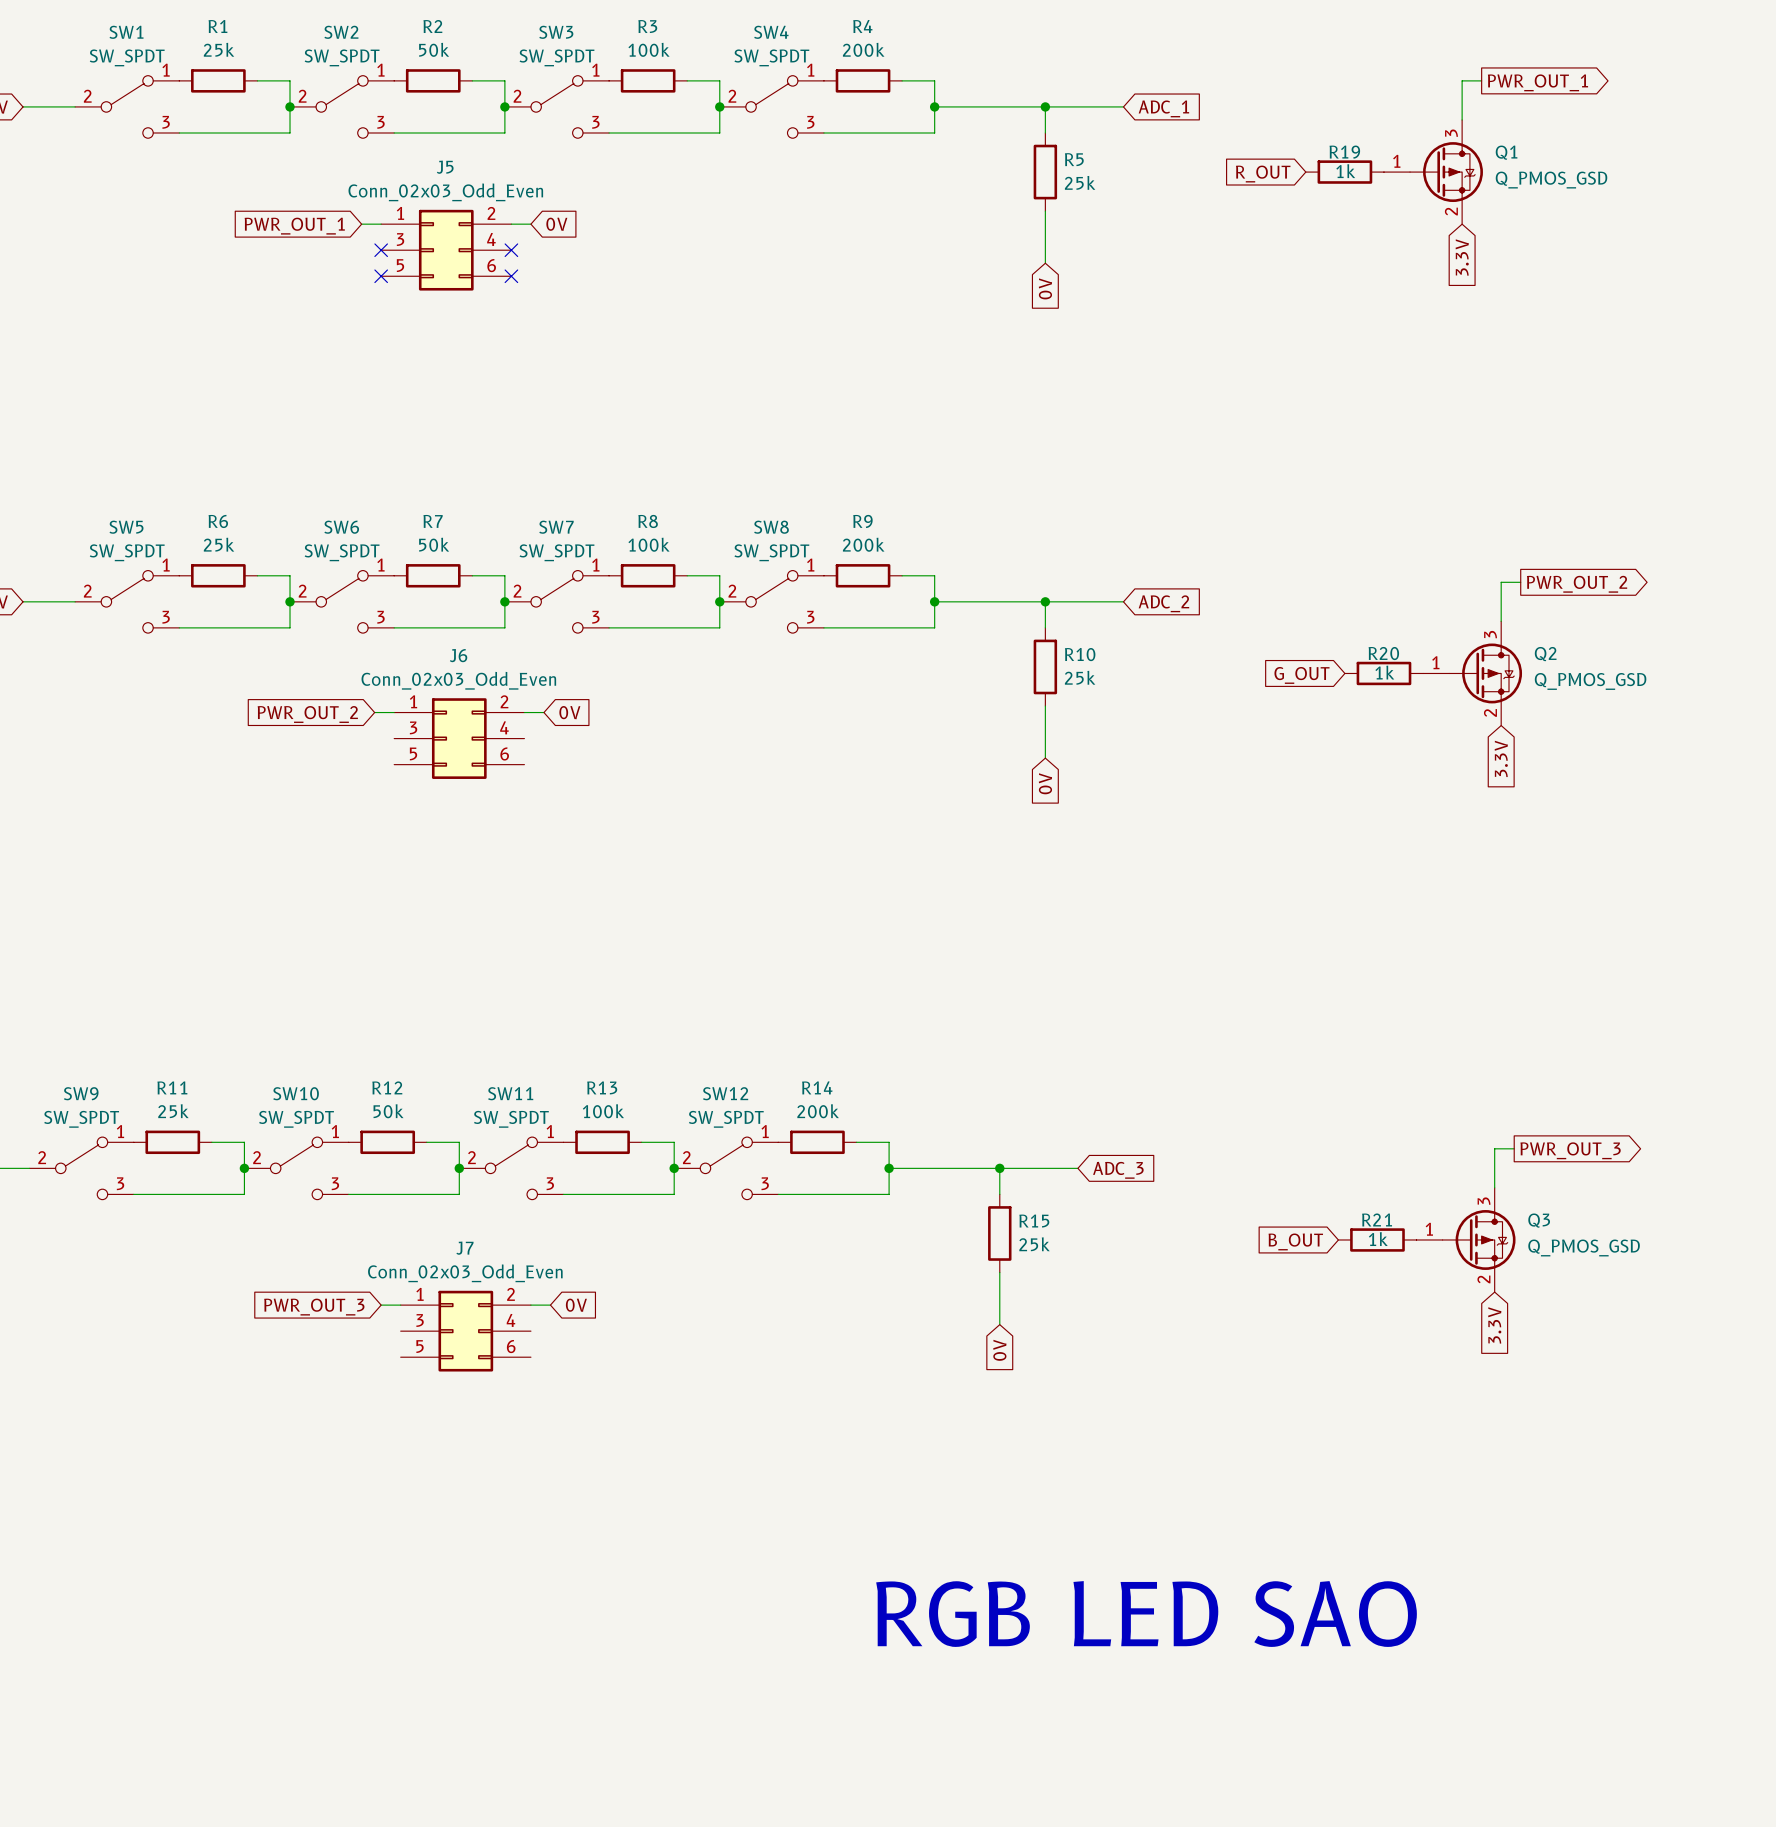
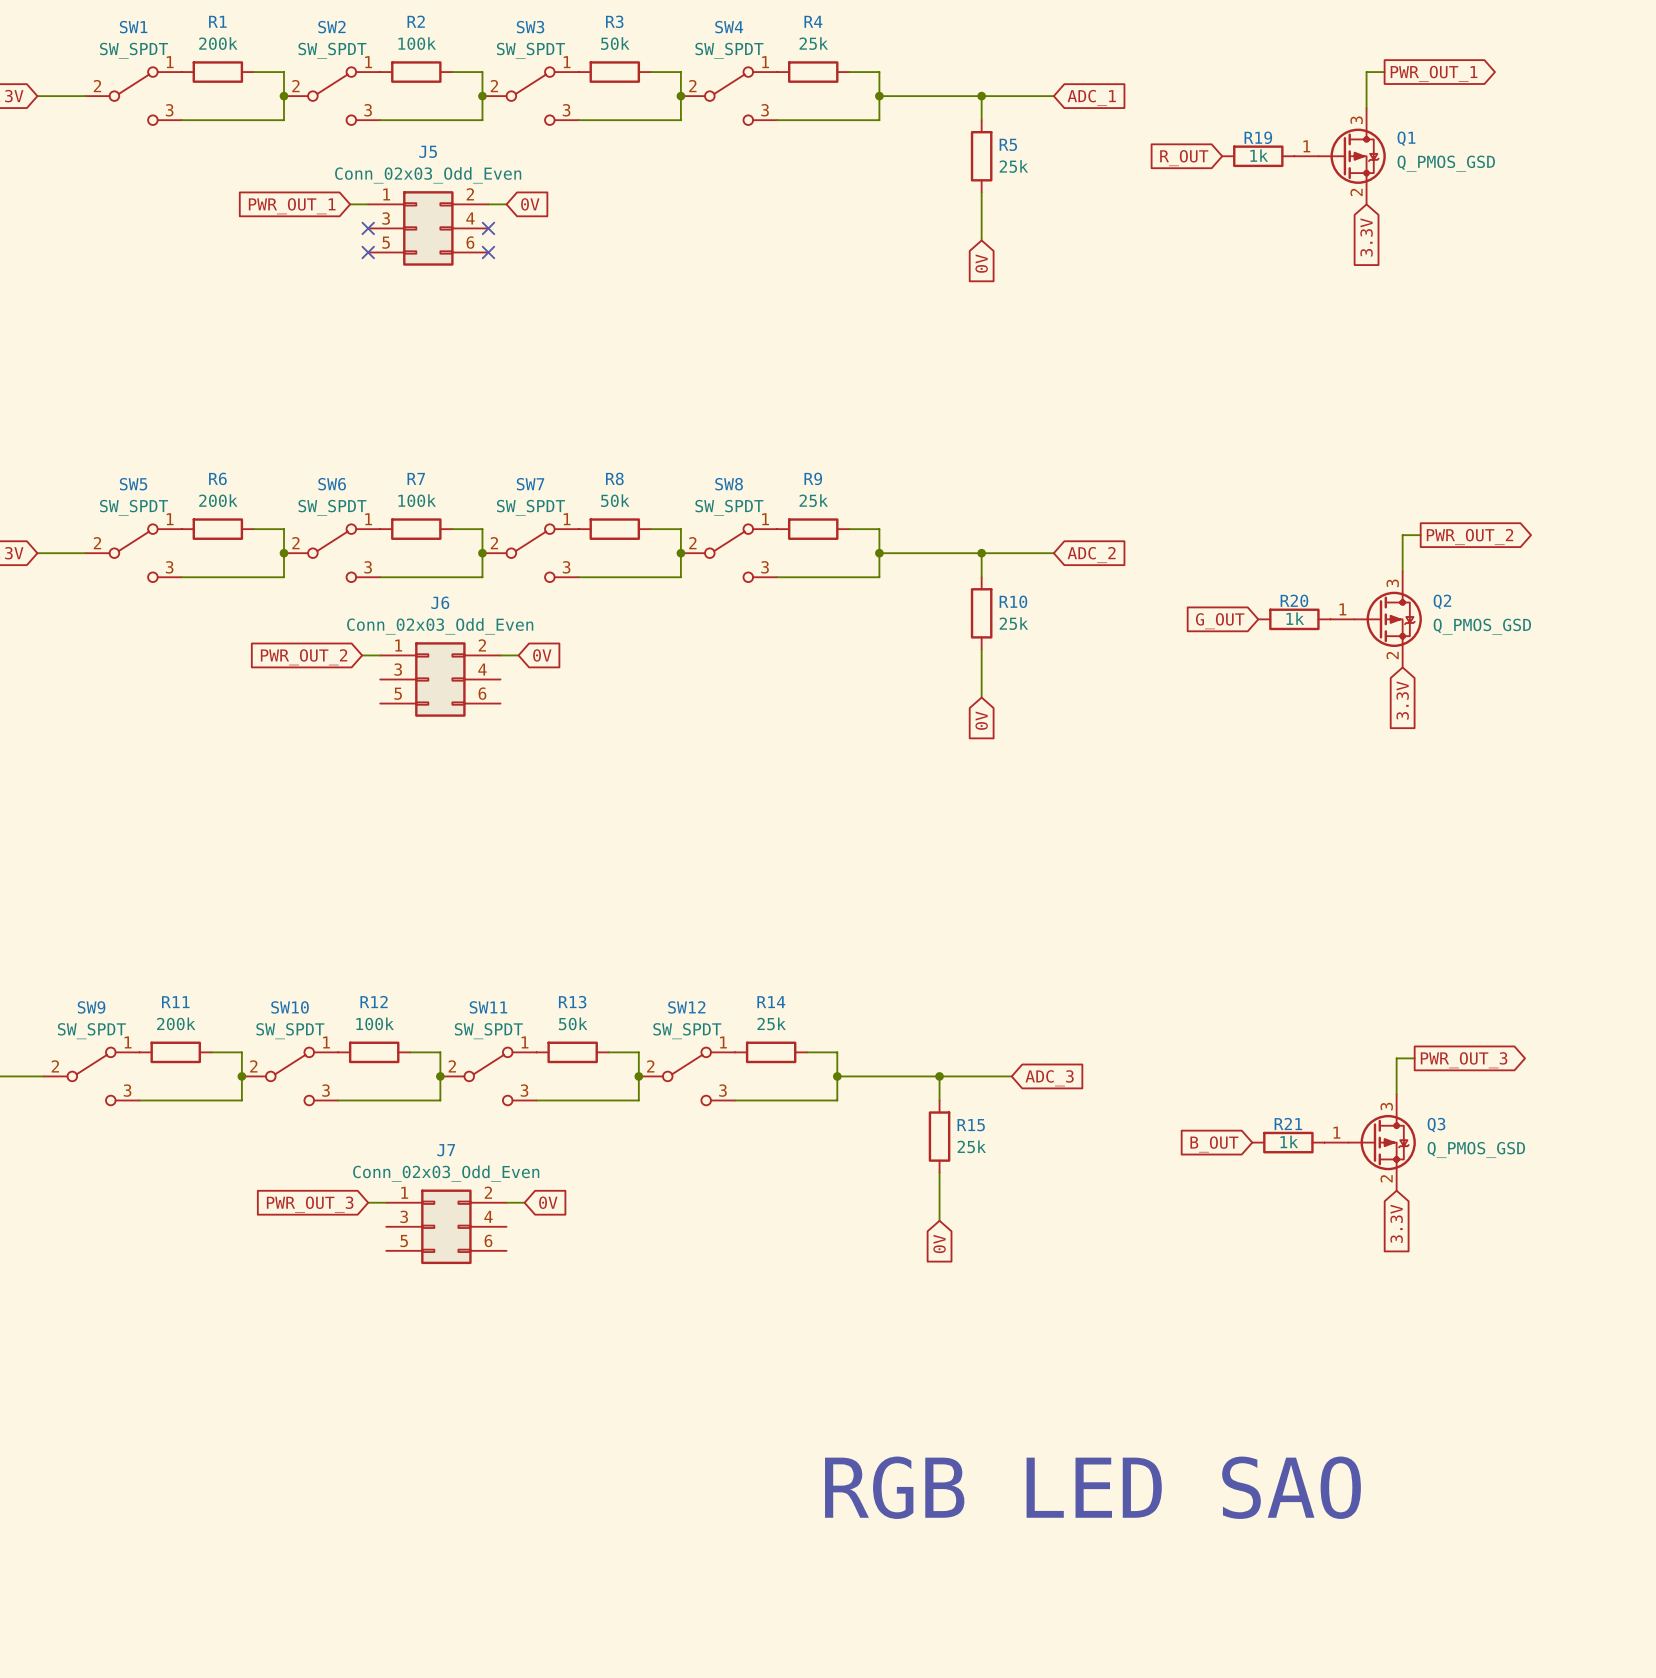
R1 value: 25k (219, 49) -> 200k (218, 43)
R2 value: 50k (434, 49) -> 100k (417, 43)
R3 value: 100k (648, 49) -> 50k (615, 43)
R4 value: 200k (863, 49) -> 25k (813, 43)
R6 value: 25k (219, 544) -> 200k (218, 500)
R7 value: 50k (434, 544) -> 100k (417, 500)
R8 value: 100k (648, 544) -> 50k (615, 500)
R9 value: 200k (863, 544) -> 25k (813, 500)
R11 value: 25k (173, 1111) -> 200k (176, 1023)
R12 value: 50k (388, 1111) -> 100k (375, 1023)
R13 value: 100k (603, 1111) -> 50k (573, 1023)
R14 value: 200k (818, 1111) -> 25k (771, 1023)

